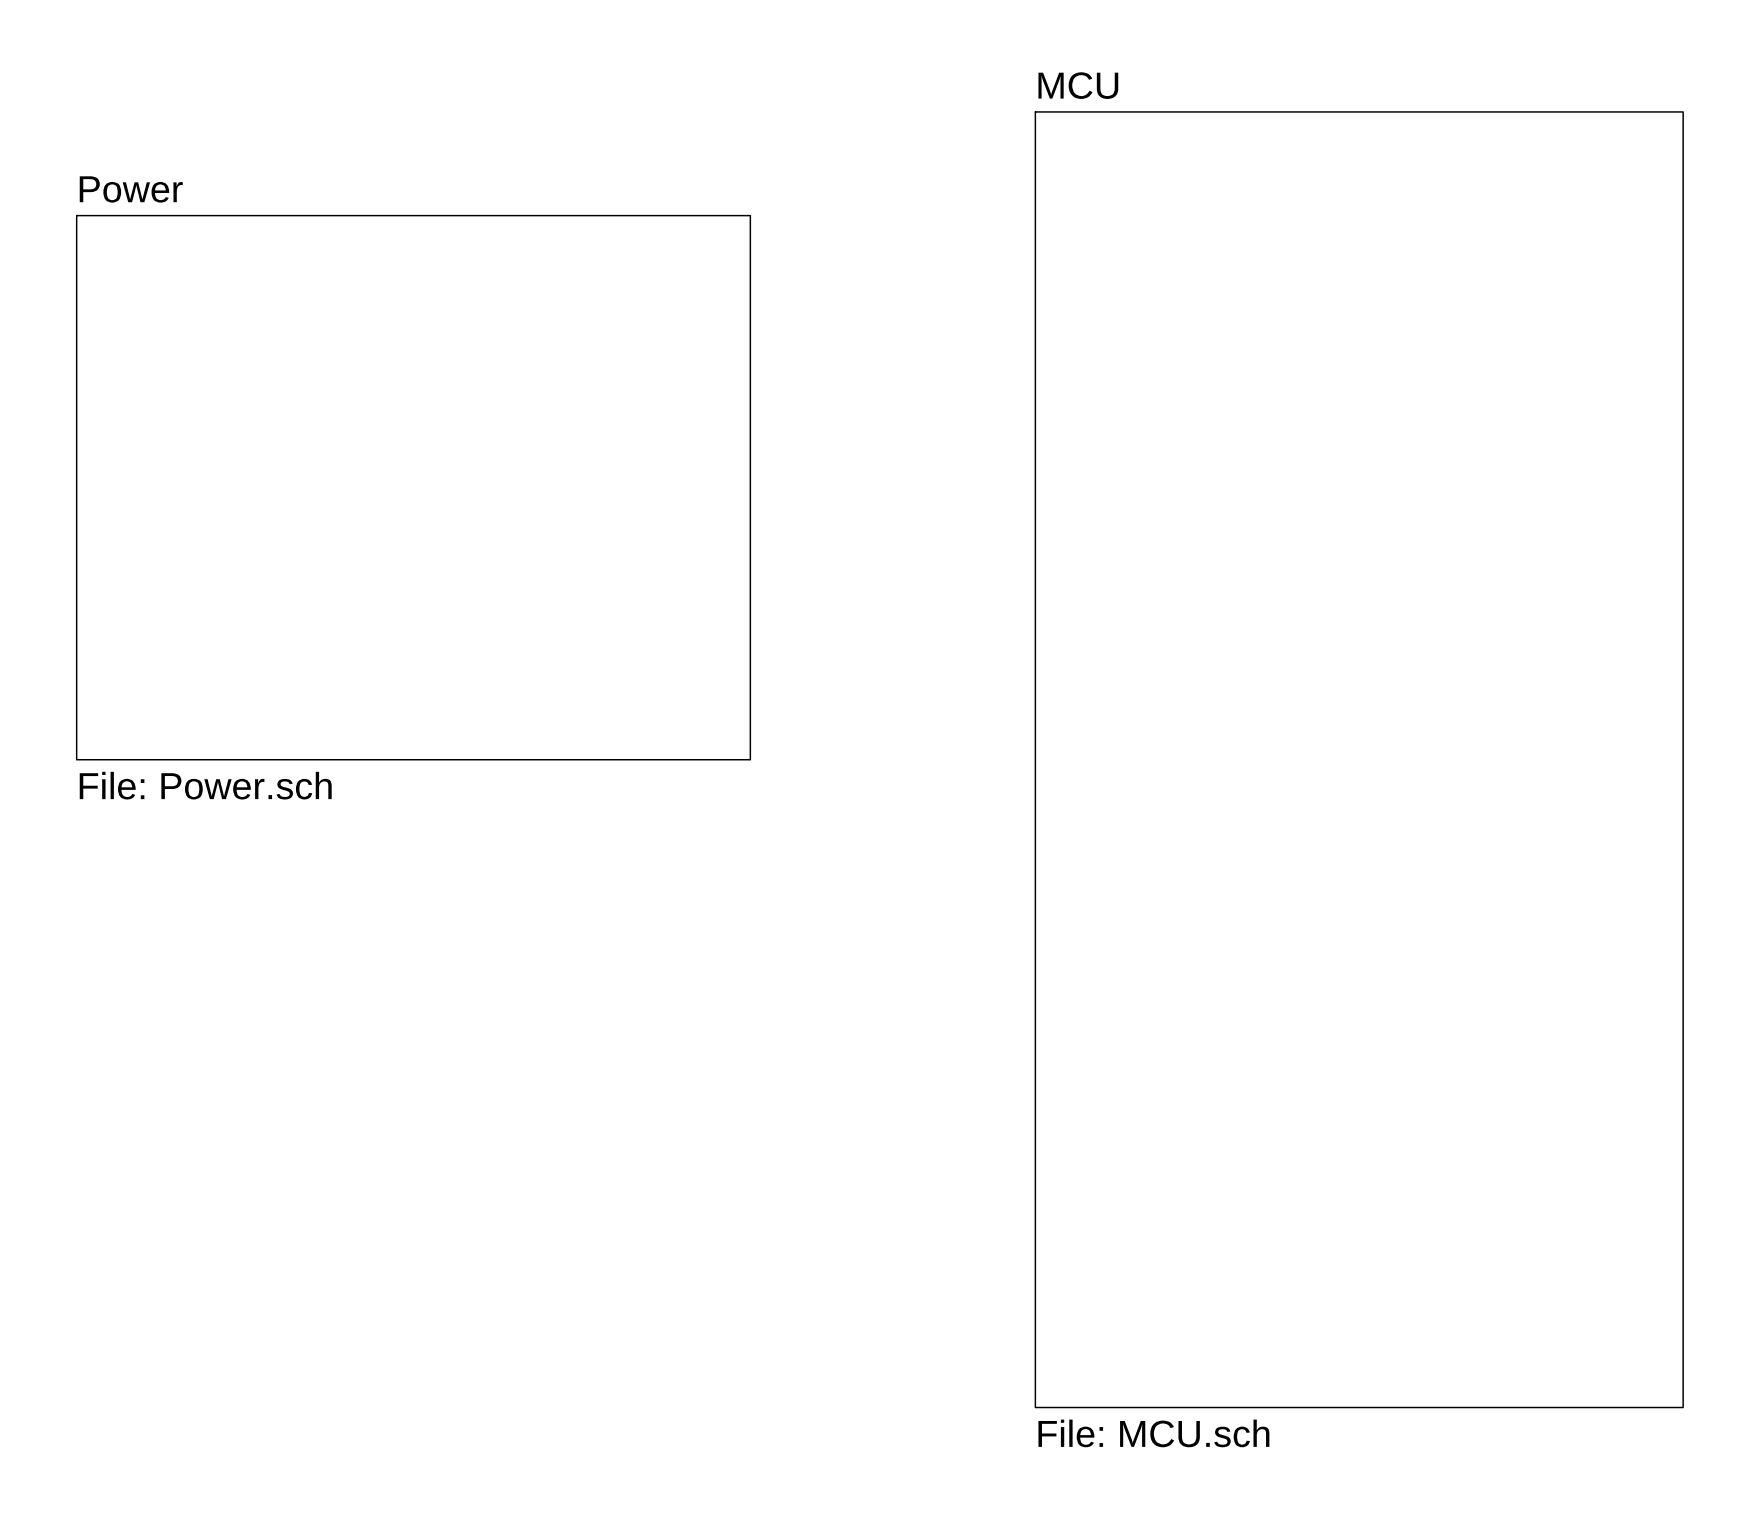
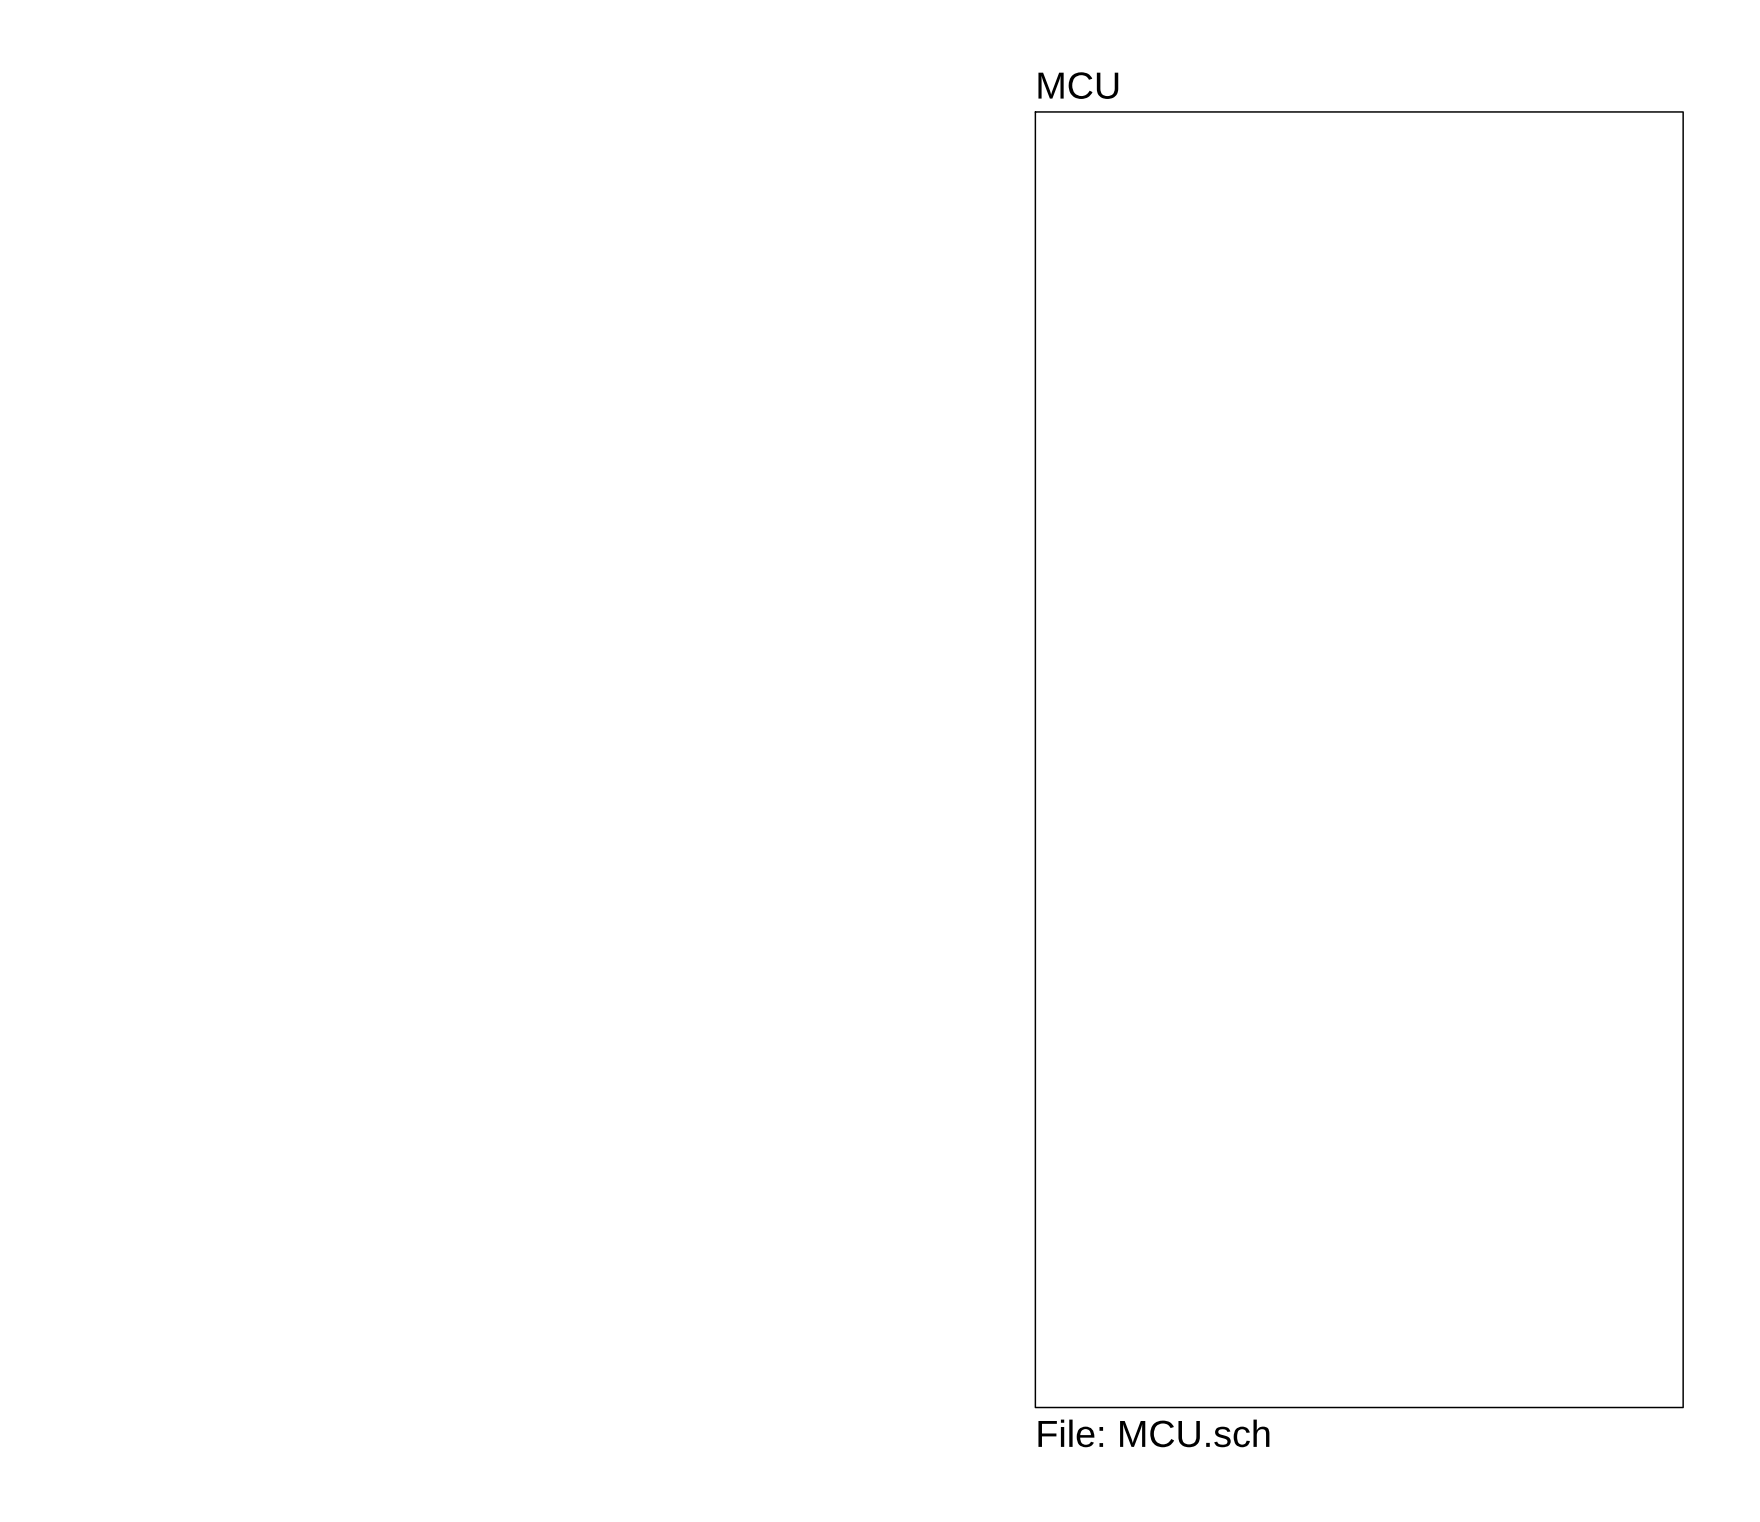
sheet Power: File: Power.sch (413, 487) -> none

